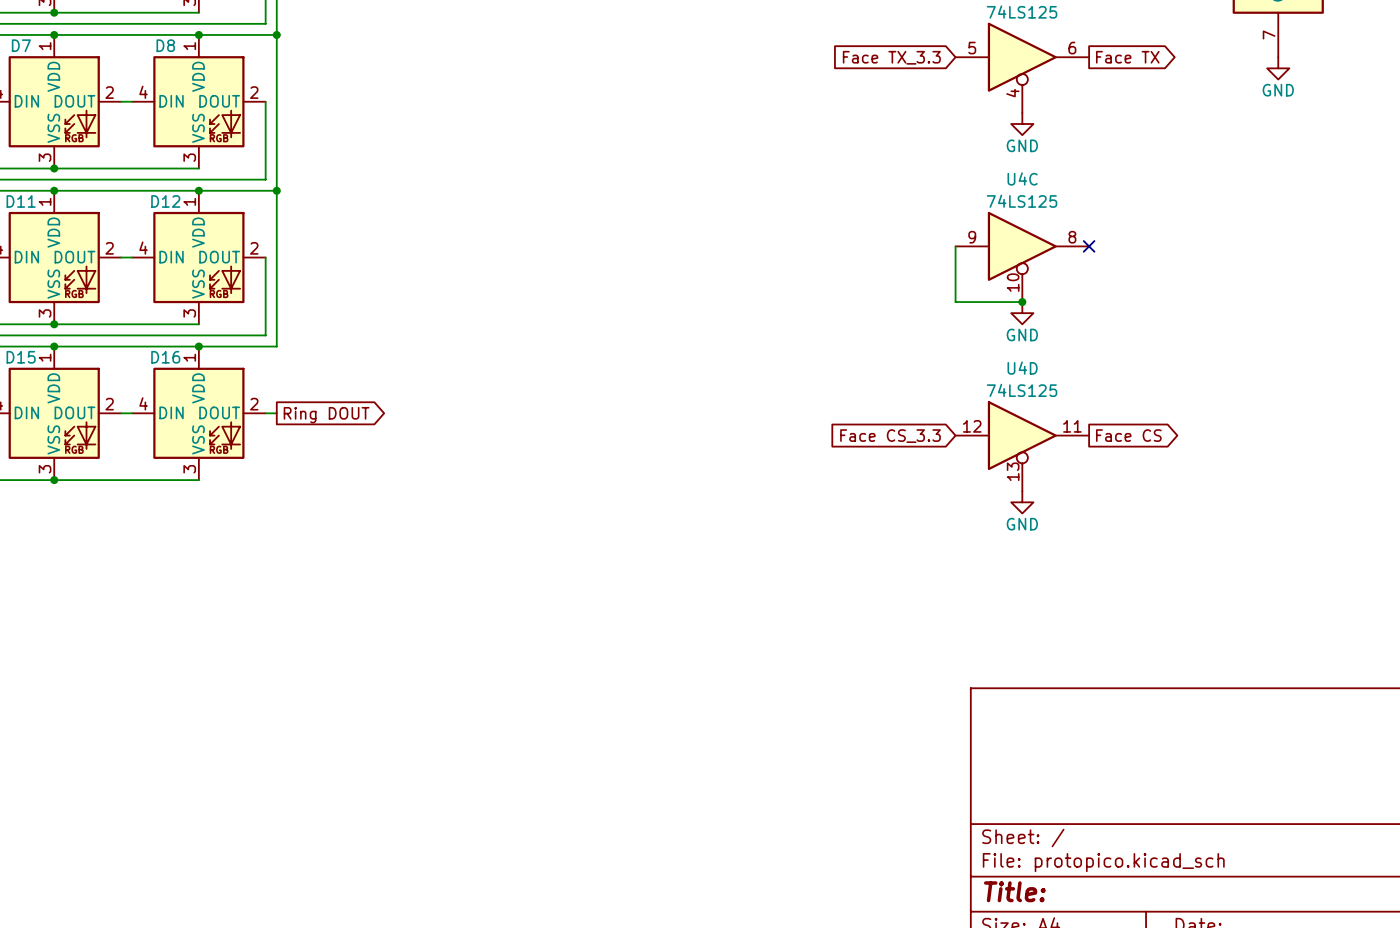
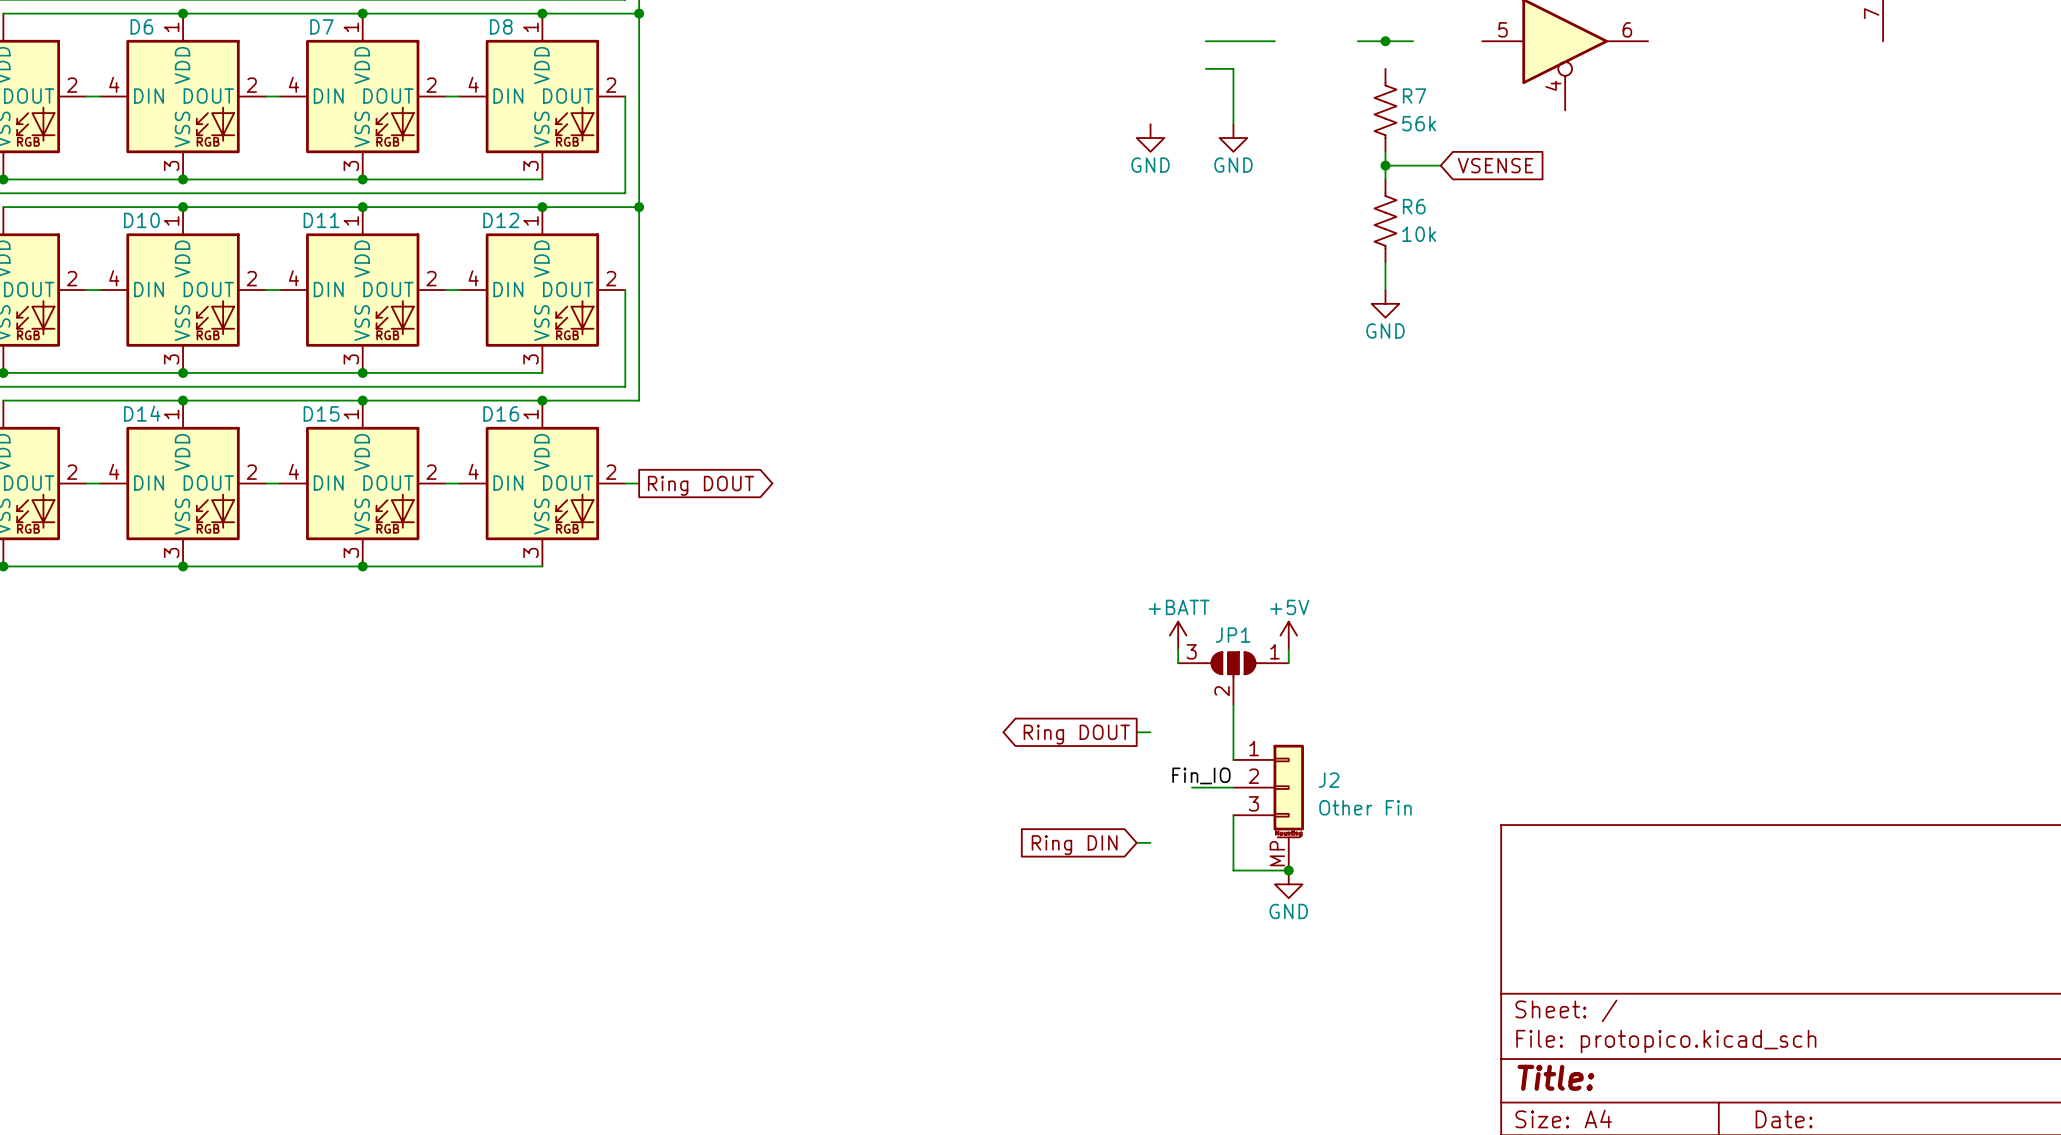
wire: none -> (1205, 41) (1274, 41)
wire: none -> (1357, 41) (1413, 41)
junction: none -> (1385, 41)
global label: Face TX_3.3 (891, 57) -> none
global label: Face TX (1127, 57) -> none
power symbol: GND (1278, 68) -> none
wire: none -> (1205, 68) (1233, 68) (1233, 124)
R7: none -> 56k (1385, 110)
power symbol: GND (1022, 124) -> none
power symbol: none -> GND (1150, 138)
power symbol: none -> GND (1233, 138)
wire: none -> (1385, 151) (1385, 179)
wire: none -> (1385, 165) (1440, 165)
junction: none -> (1385, 165)
global label: none -> VSENSE (1495, 165)
R6: none -> 10k (1385, 220)
wire: none -> (1385, 262) (1385, 290)
wire: (955, 246) (955, 302) (1022, 302) -> none
no-connect mark: (1089, 246) -> none
U4C: 74LS125 (1022, 256) -> none
power symbol: none -> GND (1385, 303)
junction: (1022, 302) -> none
power symbol: GND (1022, 313) -> none
global label: Face CS (1128, 435) -> none
global label: Face CS_3.3 (890, 436) -> none
U4D: 74LS125 (1022, 446) -> none
power symbol: GND (1022, 502) -> none
power symbol: none -> +BATT (1178, 635)
power symbol: none -> +5V (1288, 635)
wire: none -> (1178, 649) (1178, 663)
wire: none -> (1288, 649) (1288, 663)
JP1: none -> (1233, 678)
wire: none -> (1233, 704) (1233, 759)
wire: none -> (1136, 732) (1150, 732)
global label: none -> Ring DOUT (1076, 734)
label: none -> Fin_IO (1201, 775)
wire: none -> (1191, 787) (1233, 787)
J2: none -> Other Fin (1268, 807)
wire: none -> (1233, 815) (1233, 870) (1288, 870)
wire: none -> (1136, 842) (1150, 842)
global label: none -> Ring DIN (1074, 845)
junction: none -> (1288, 870)
power symbol: none -> GND (1288, 884)

